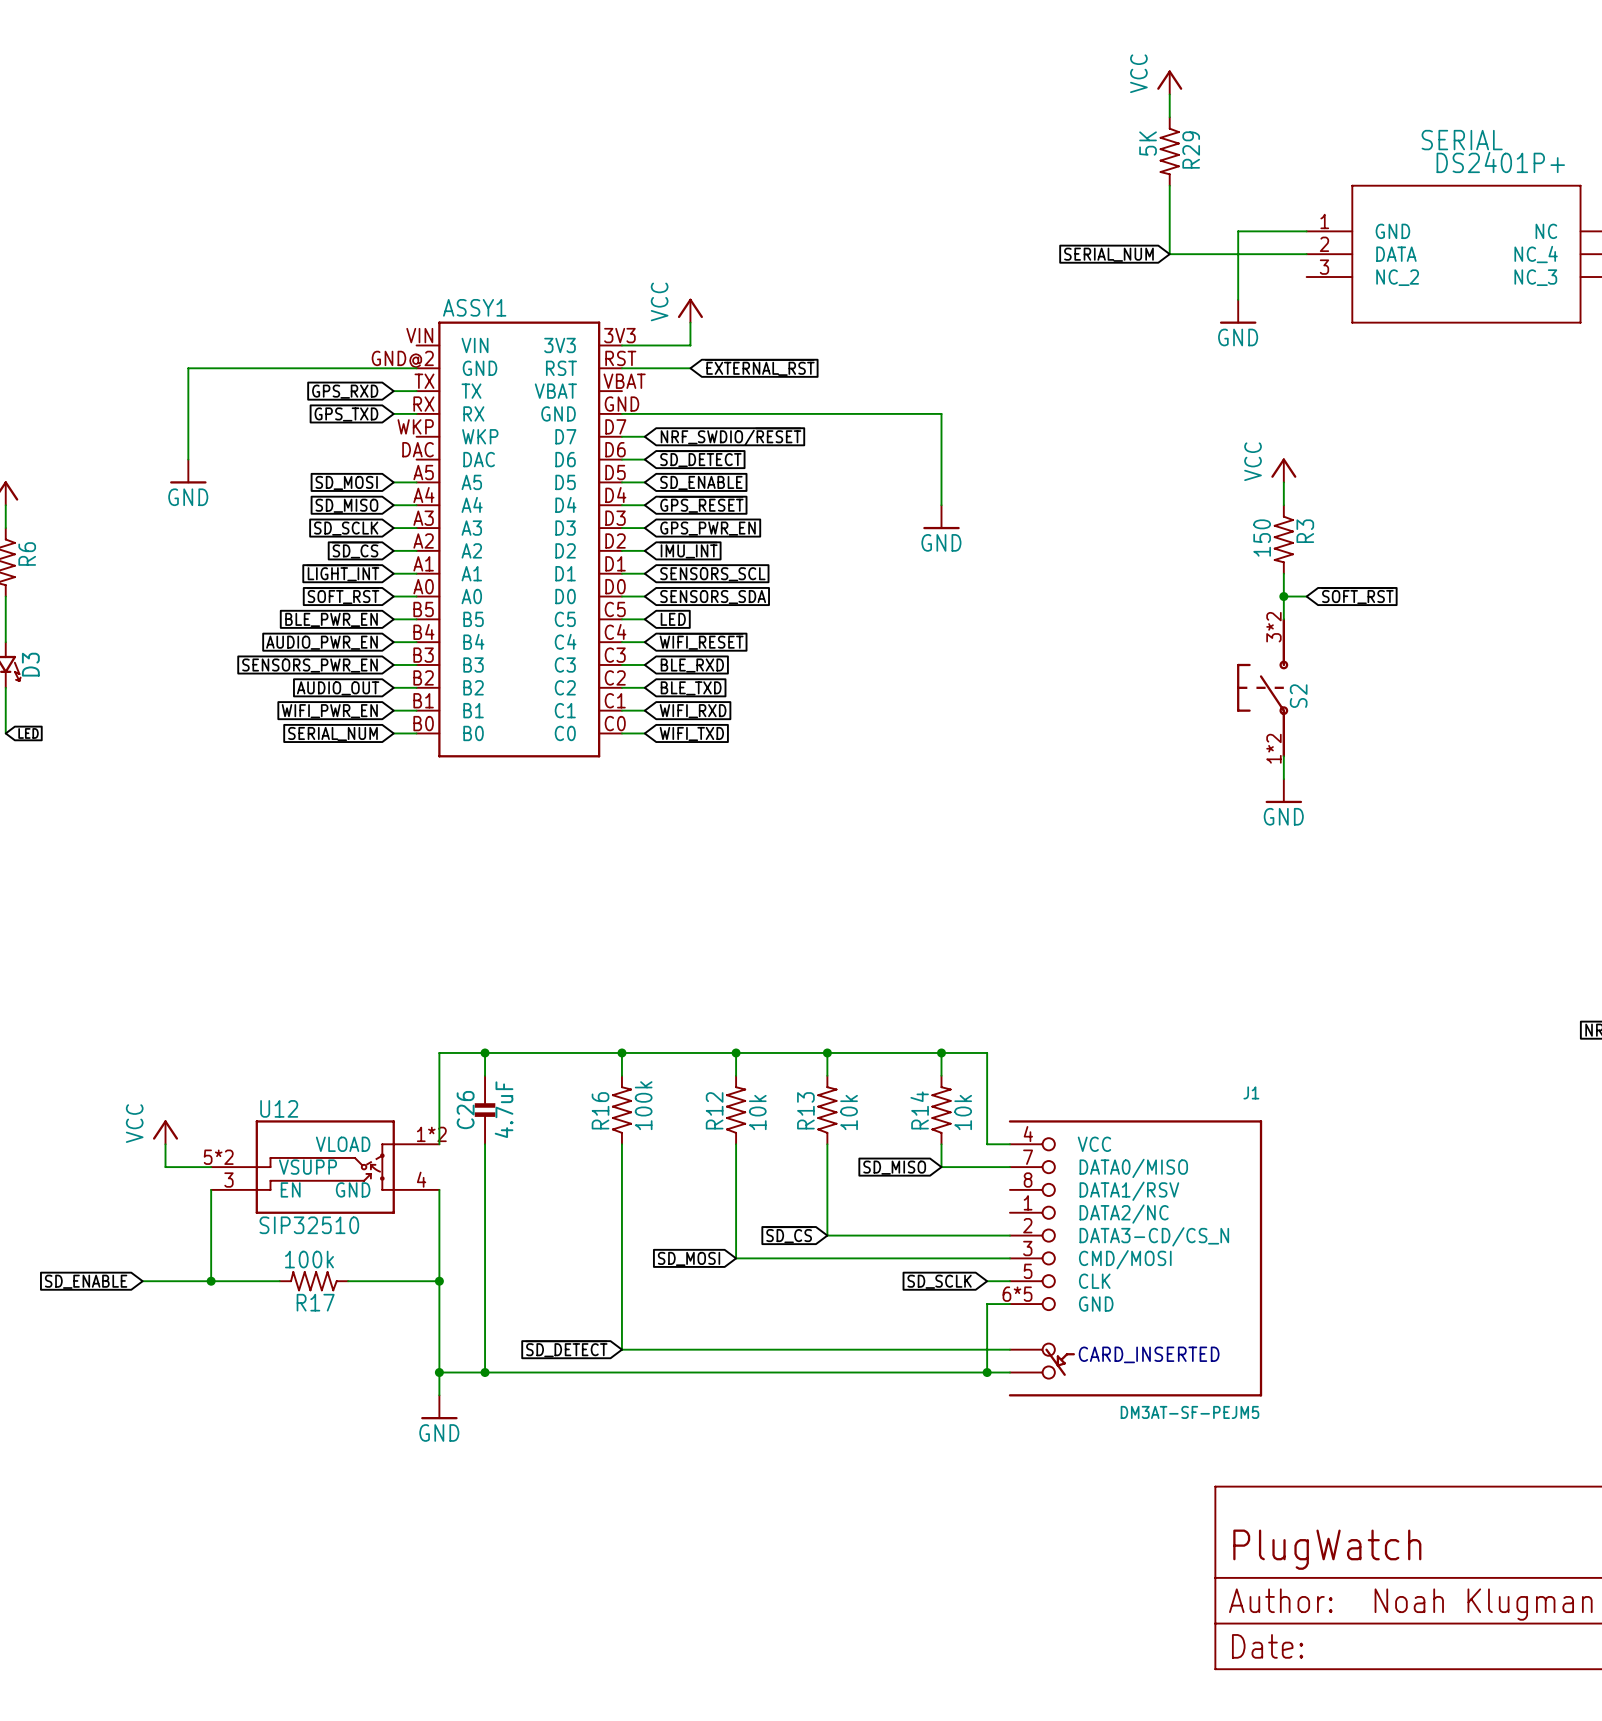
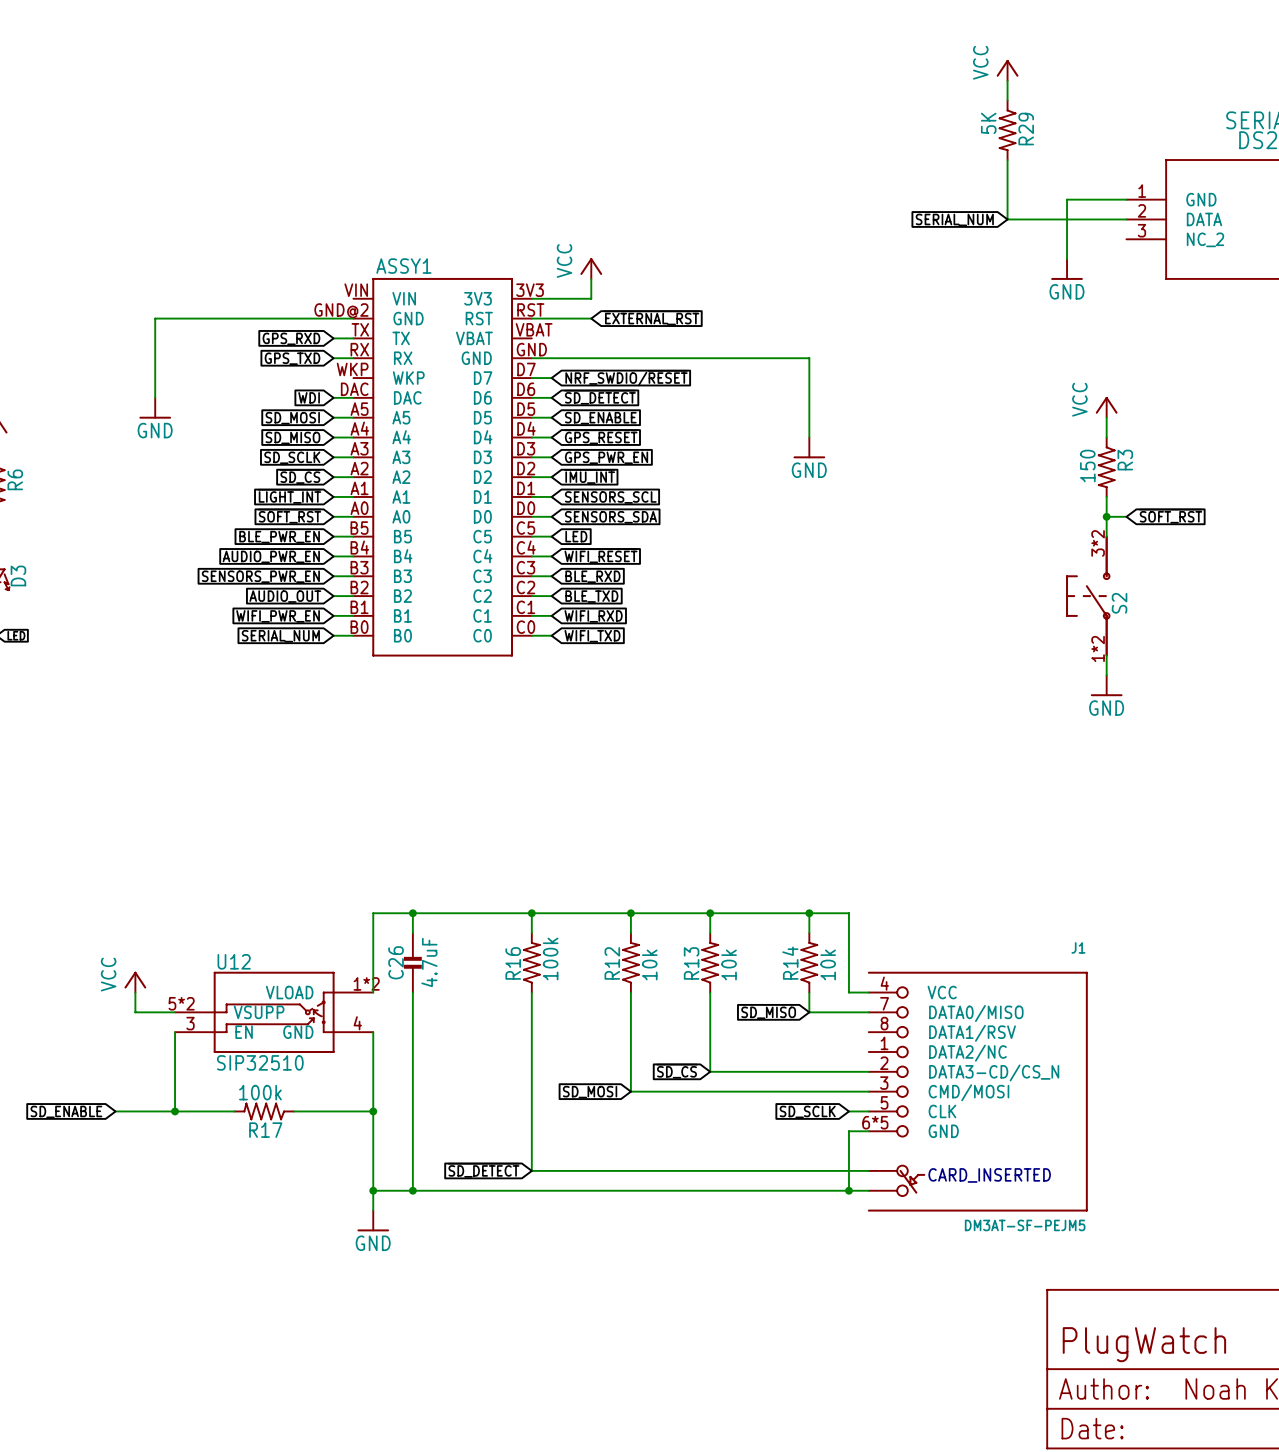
global label: none -> WDI (309, 397)
wire: none -> (333, 397) (353, 397)

